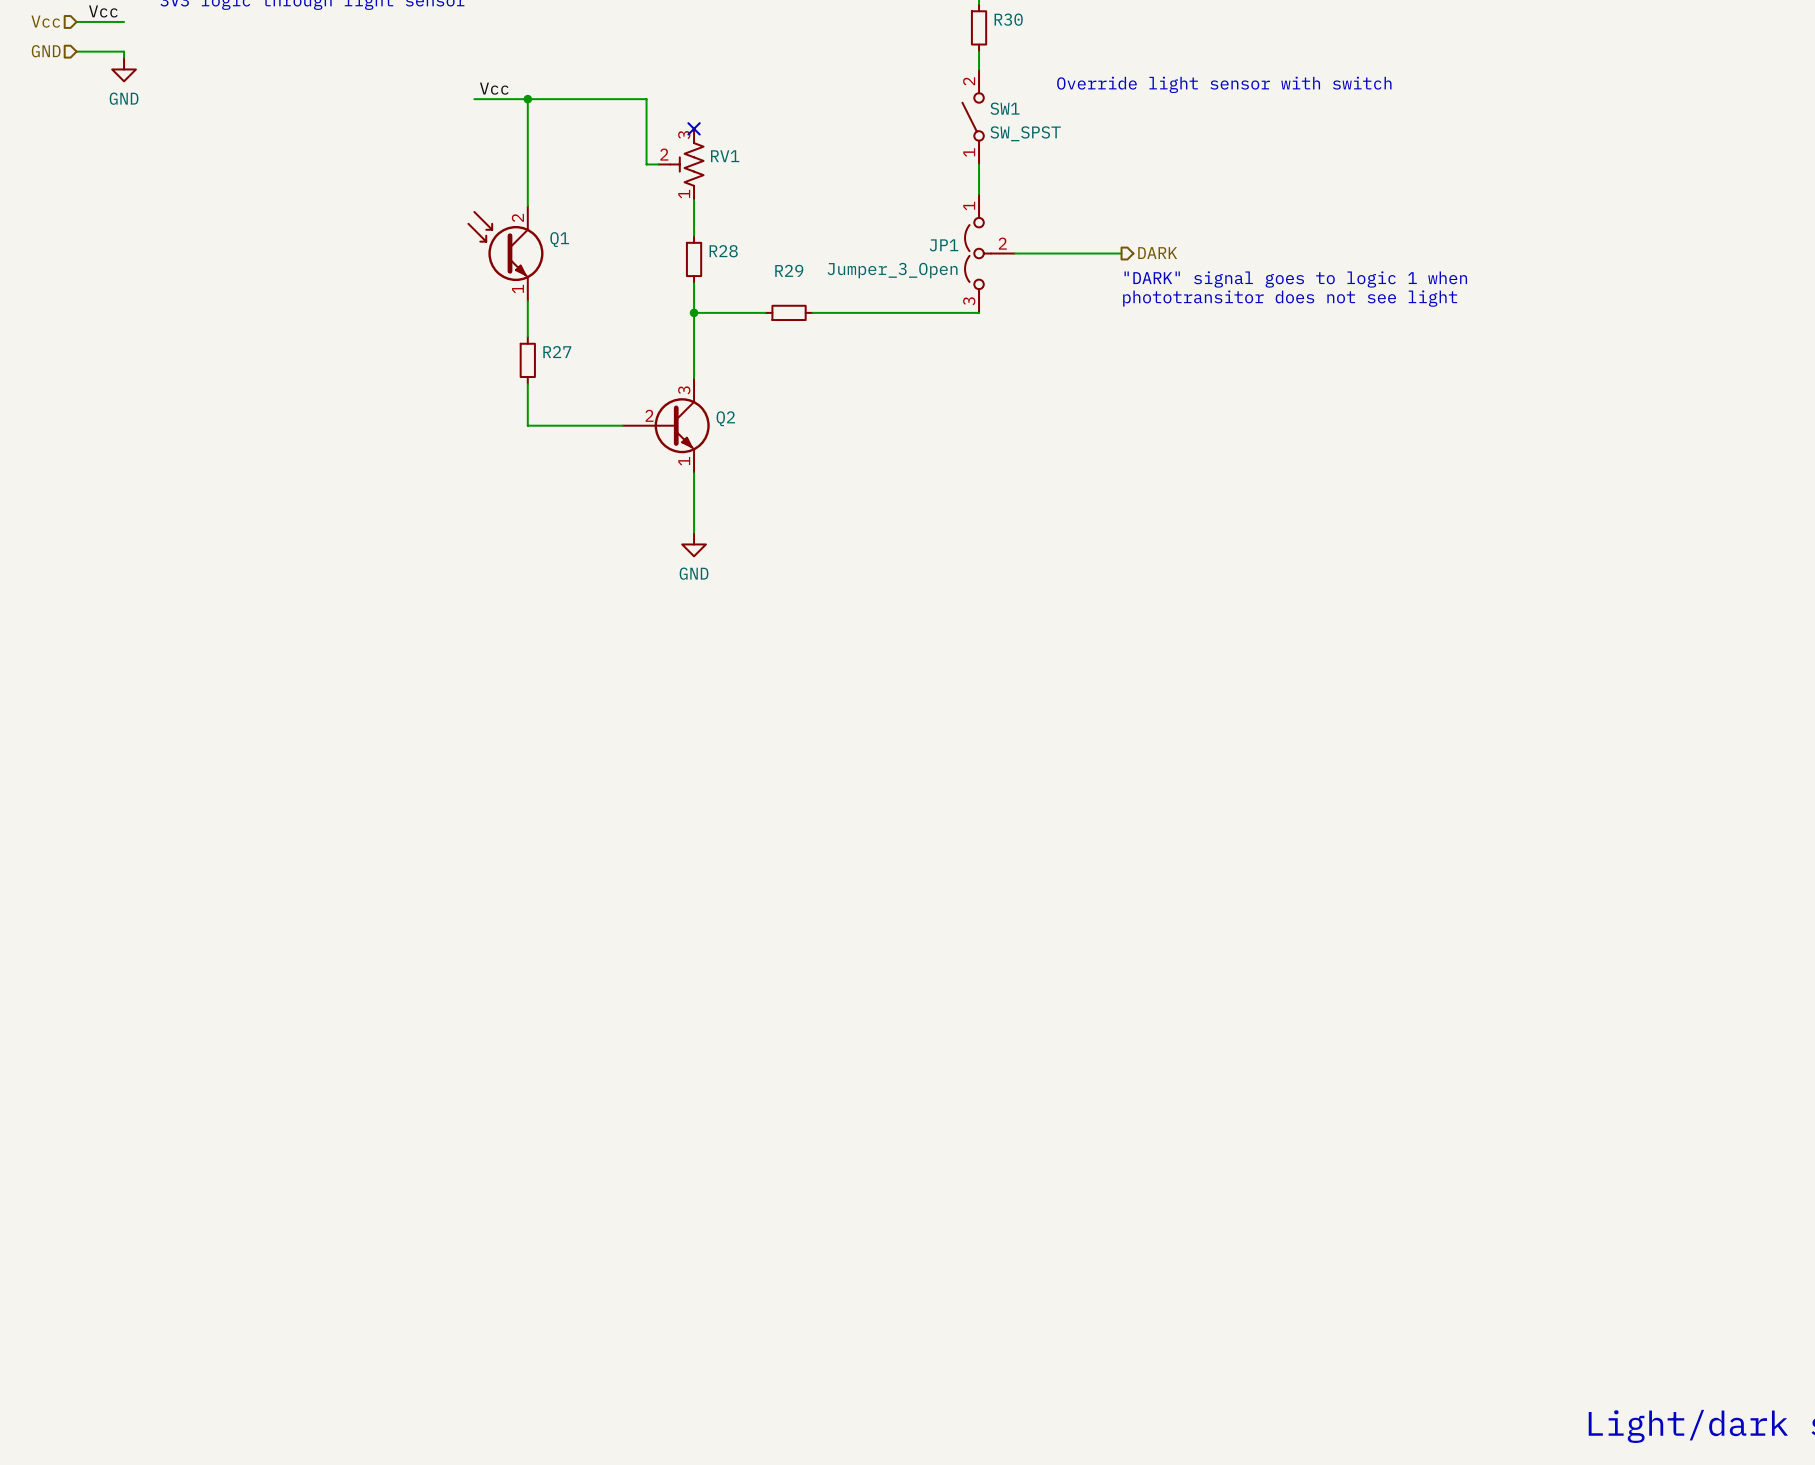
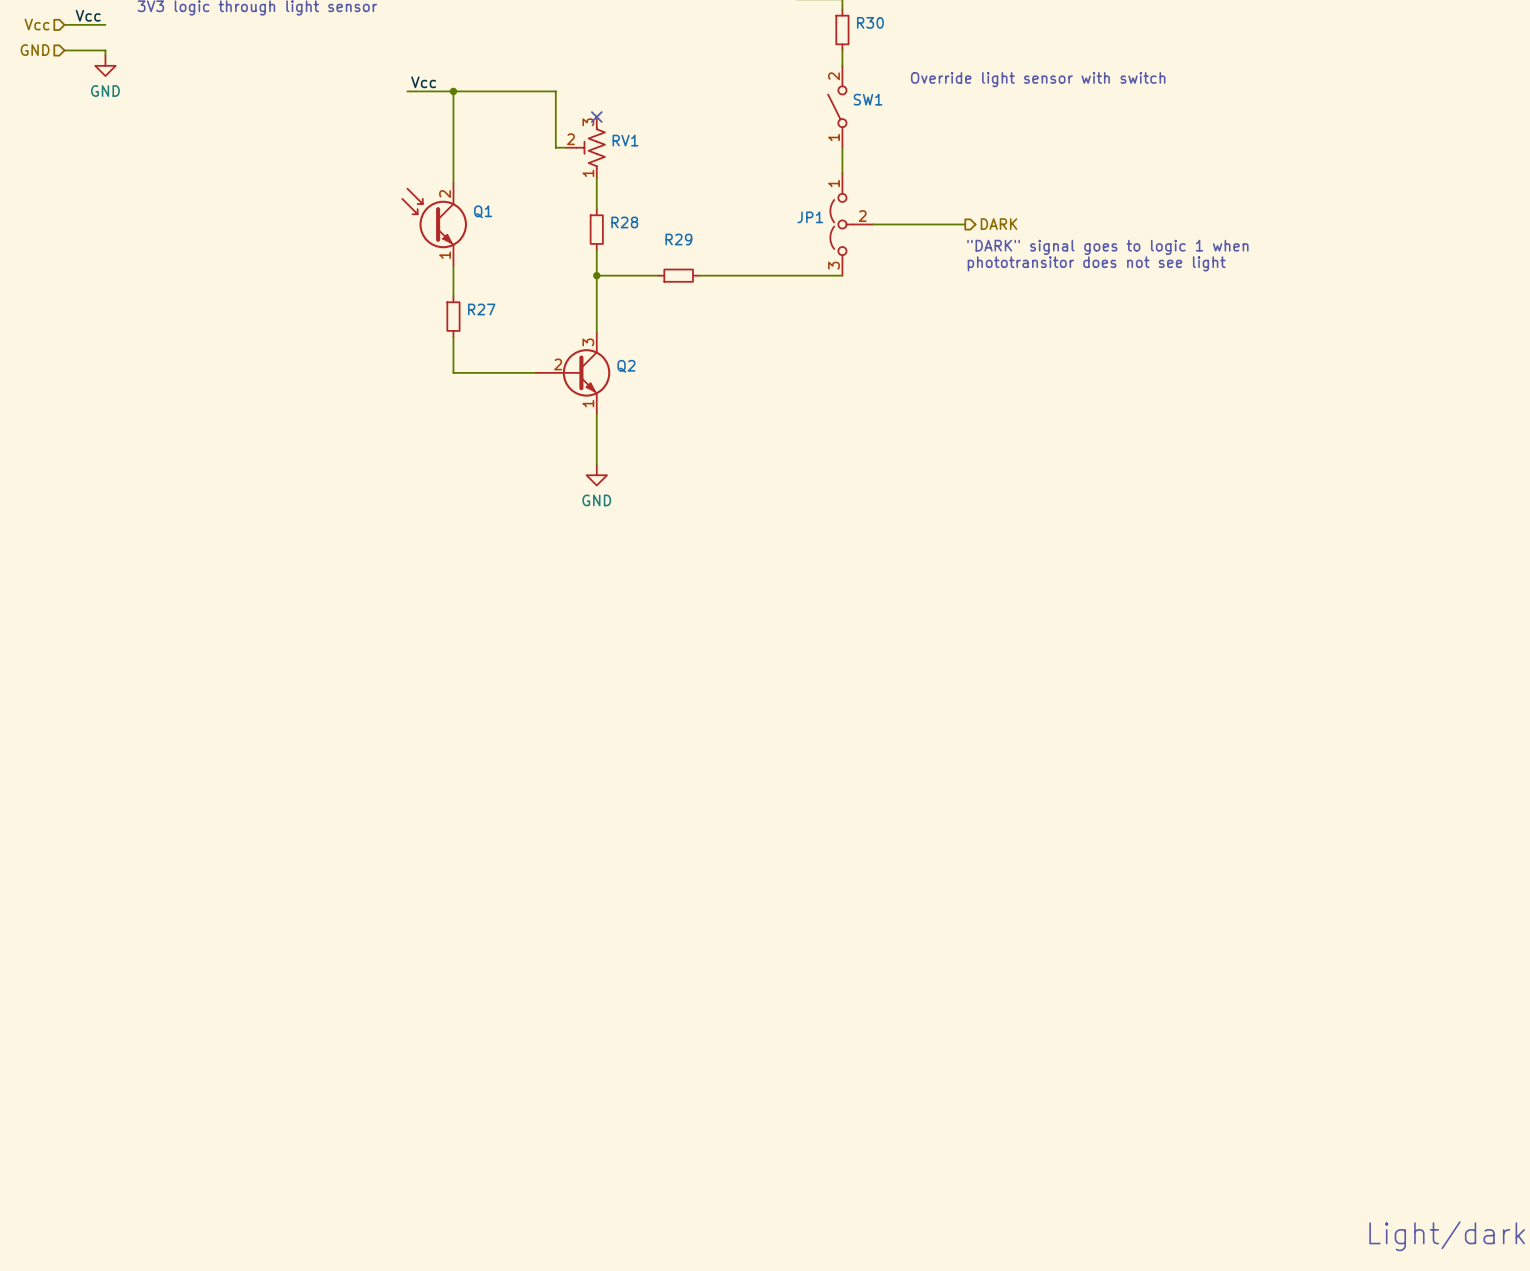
SW1 value: SW_SPST (1025, 133) -> none
JP1 value: Jumper_3_Open (892, 270) -> none

